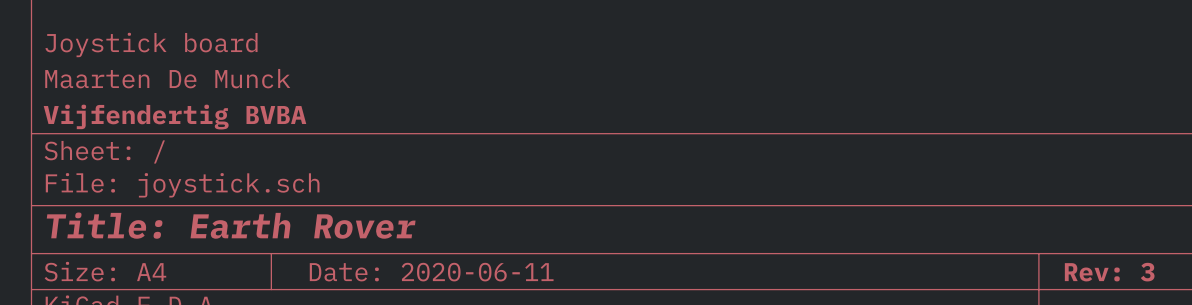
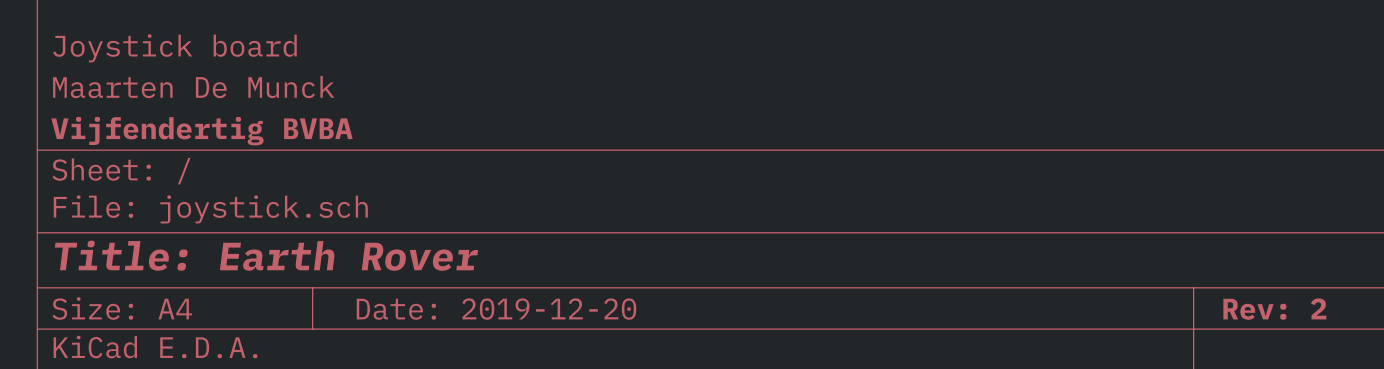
title block: Date: 2020-06-11 (431, 272) -> Date: 2019-12-20 (496, 309)
title block: Rev: 3 (1109, 272) -> Rev: 2 (1274, 309)

